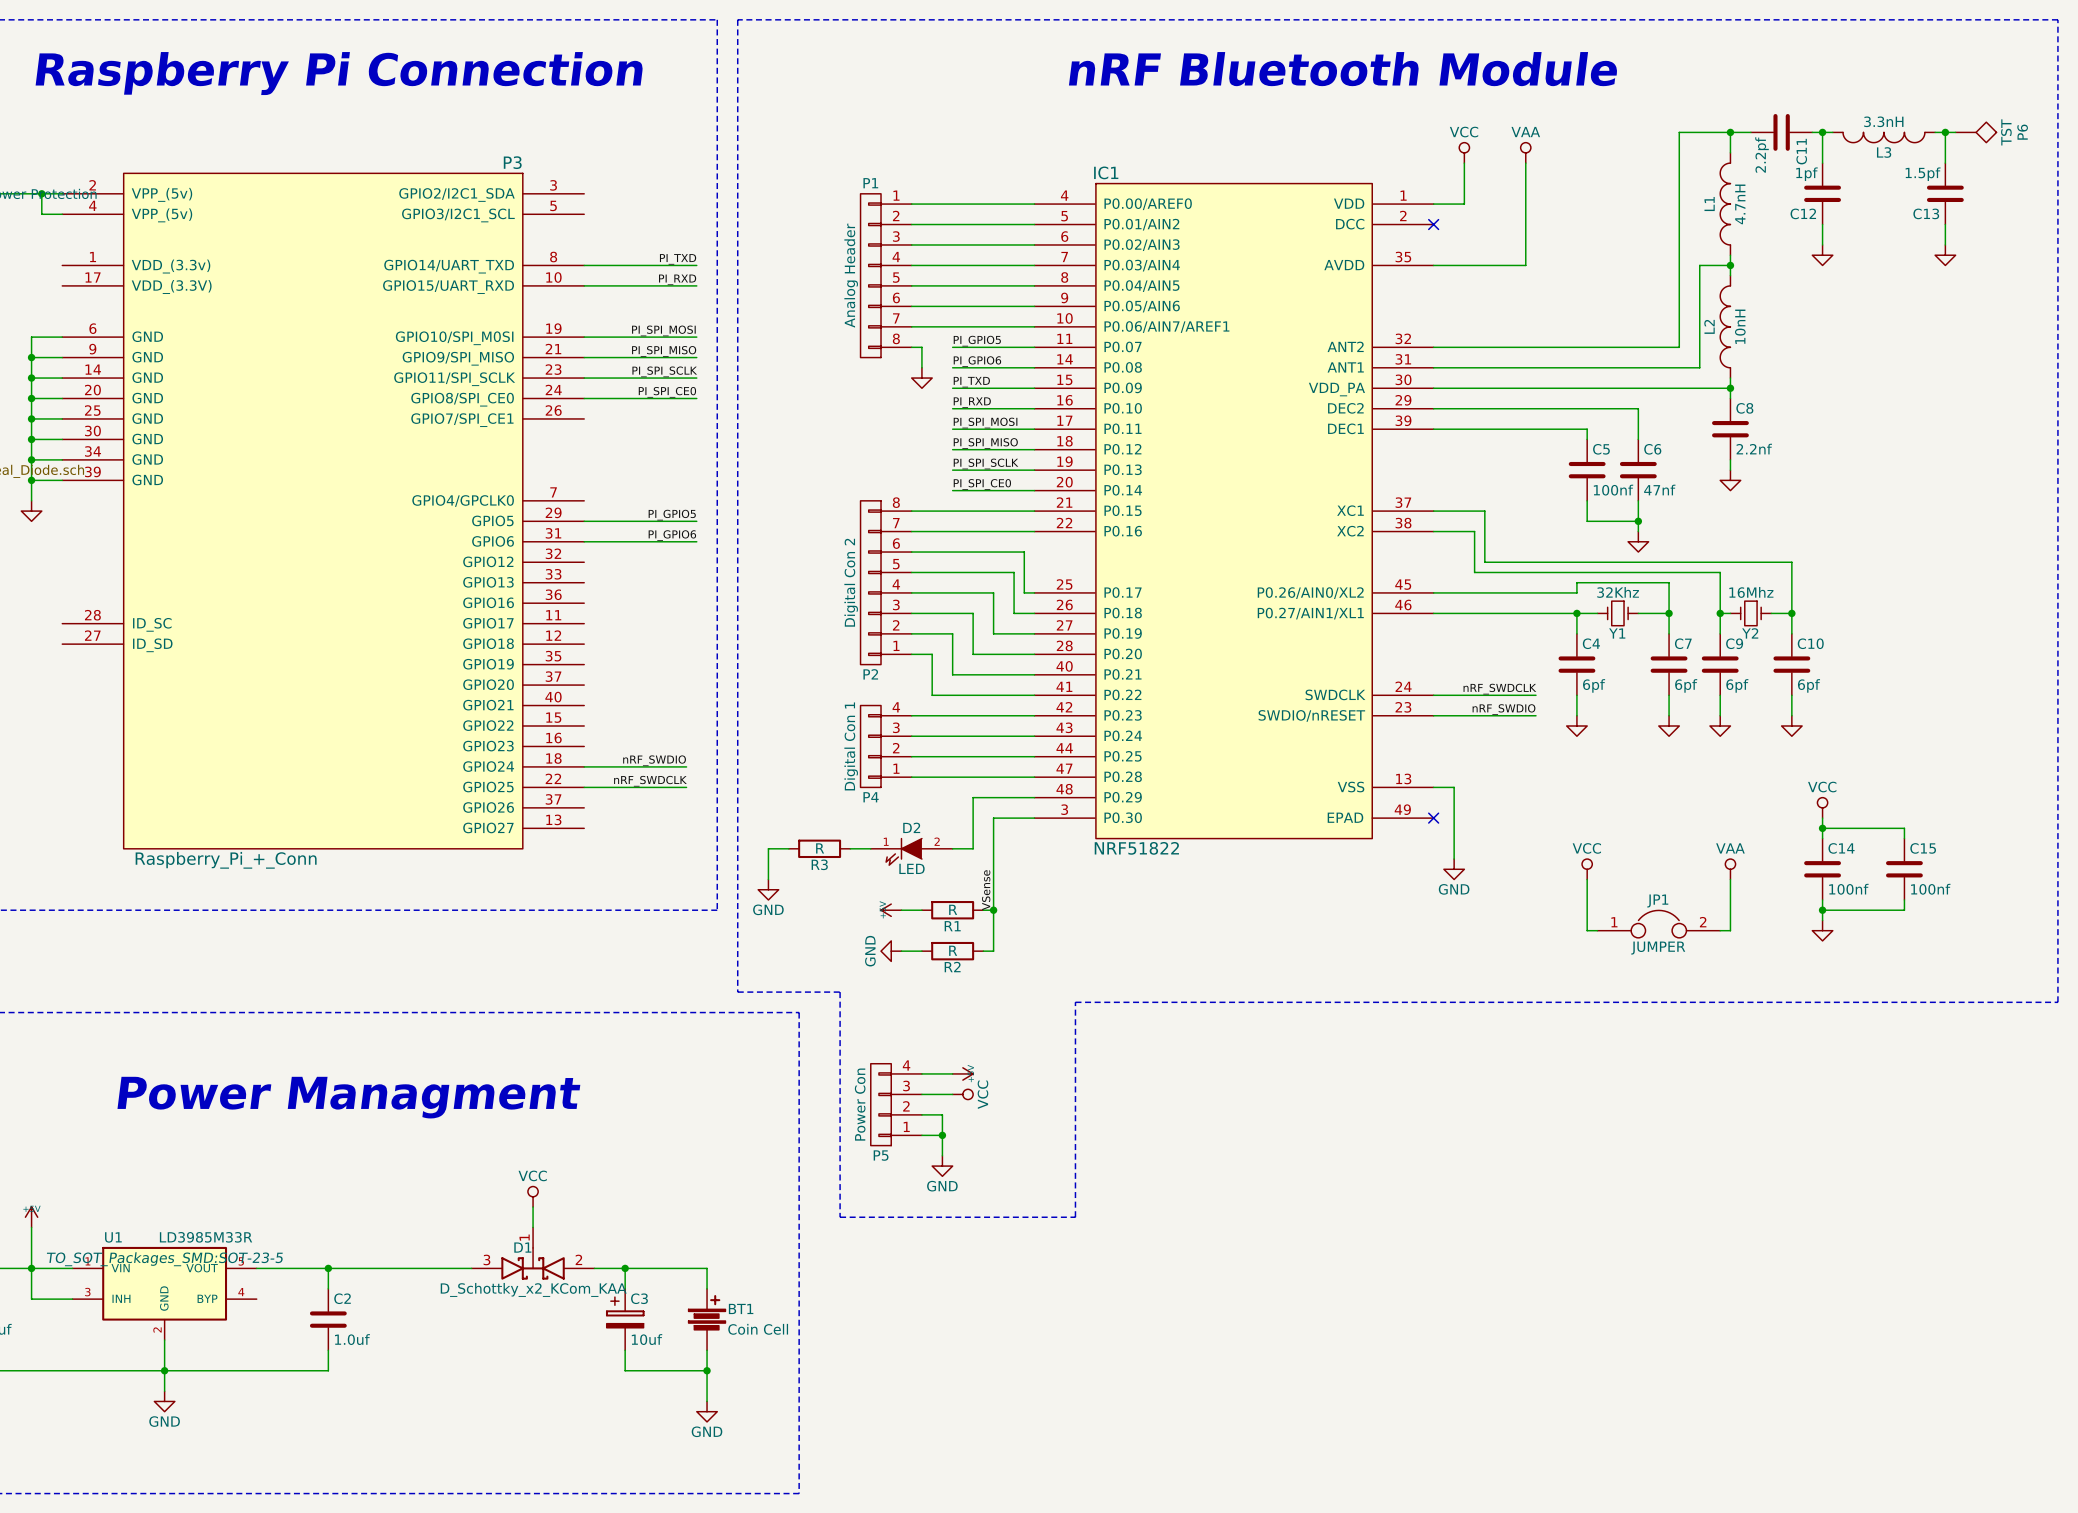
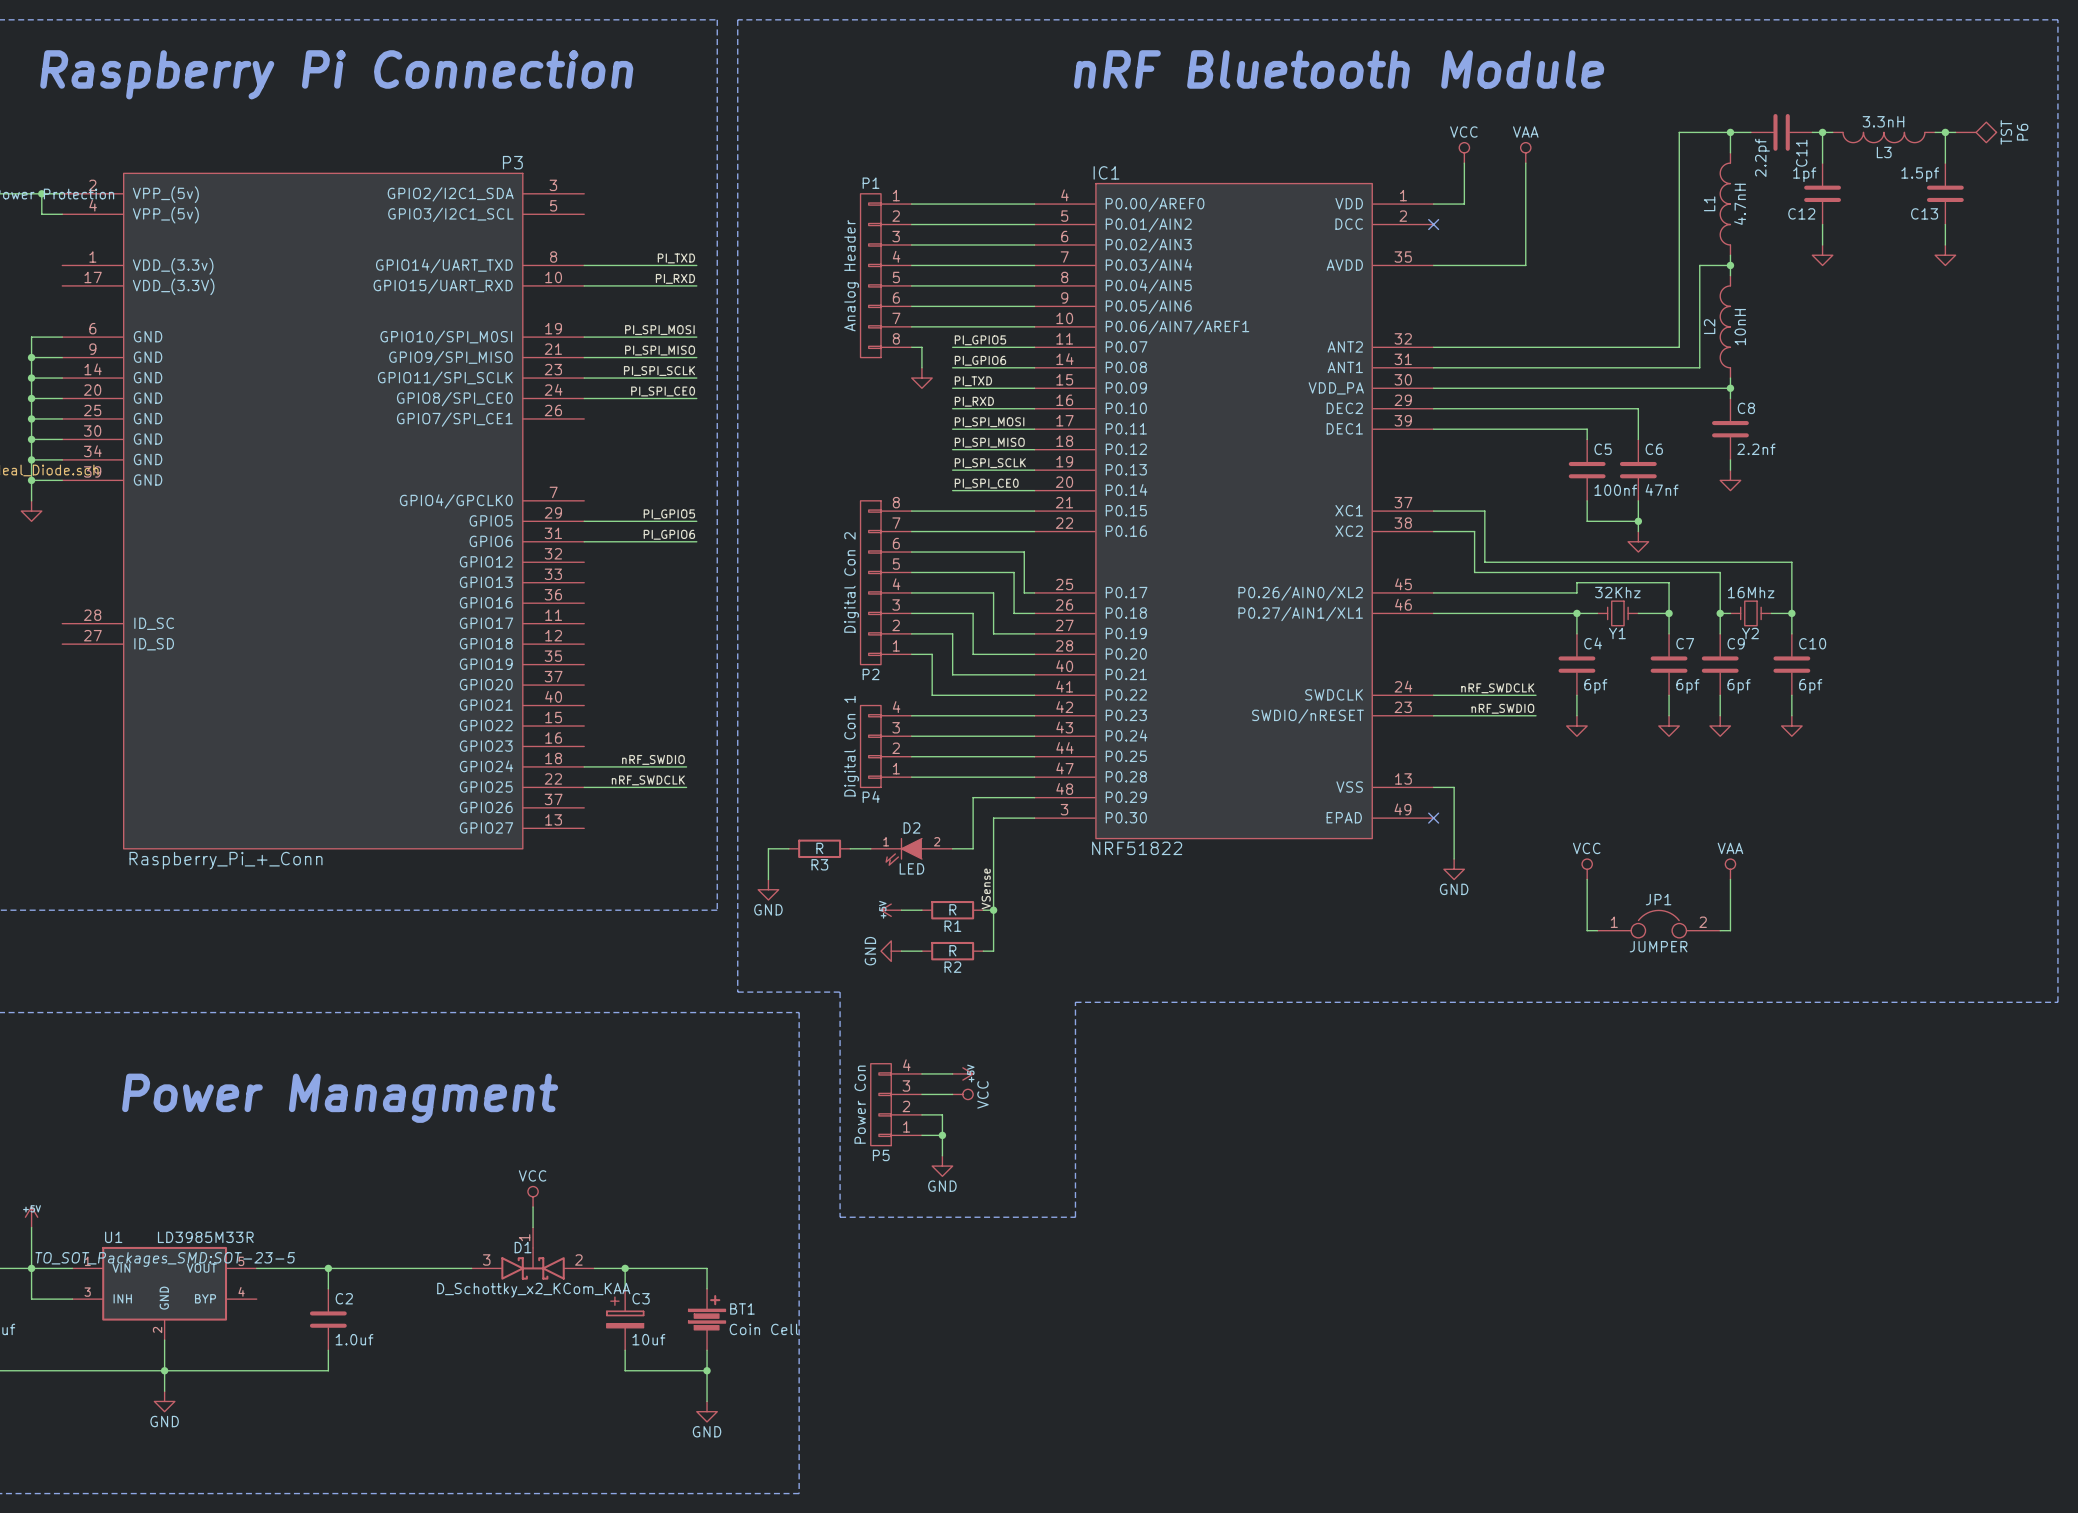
power symbol: VCC (1822, 807) -> none
wire: (1822, 818) (1822, 838) -> none
wire: (1822, 828) (1904, 828) (1904, 838) -> none
junction: (1822, 828) -> none
C14: 100nf (1822, 869) -> none
C15: 100nf (1904, 869) -> none
wire: (1822, 899) (1822, 920) -> none
wire: (1904, 899) (1904, 910) (1822, 910) -> none
junction: (1822, 910) -> none
power symbol: (1822, 930) -> none

